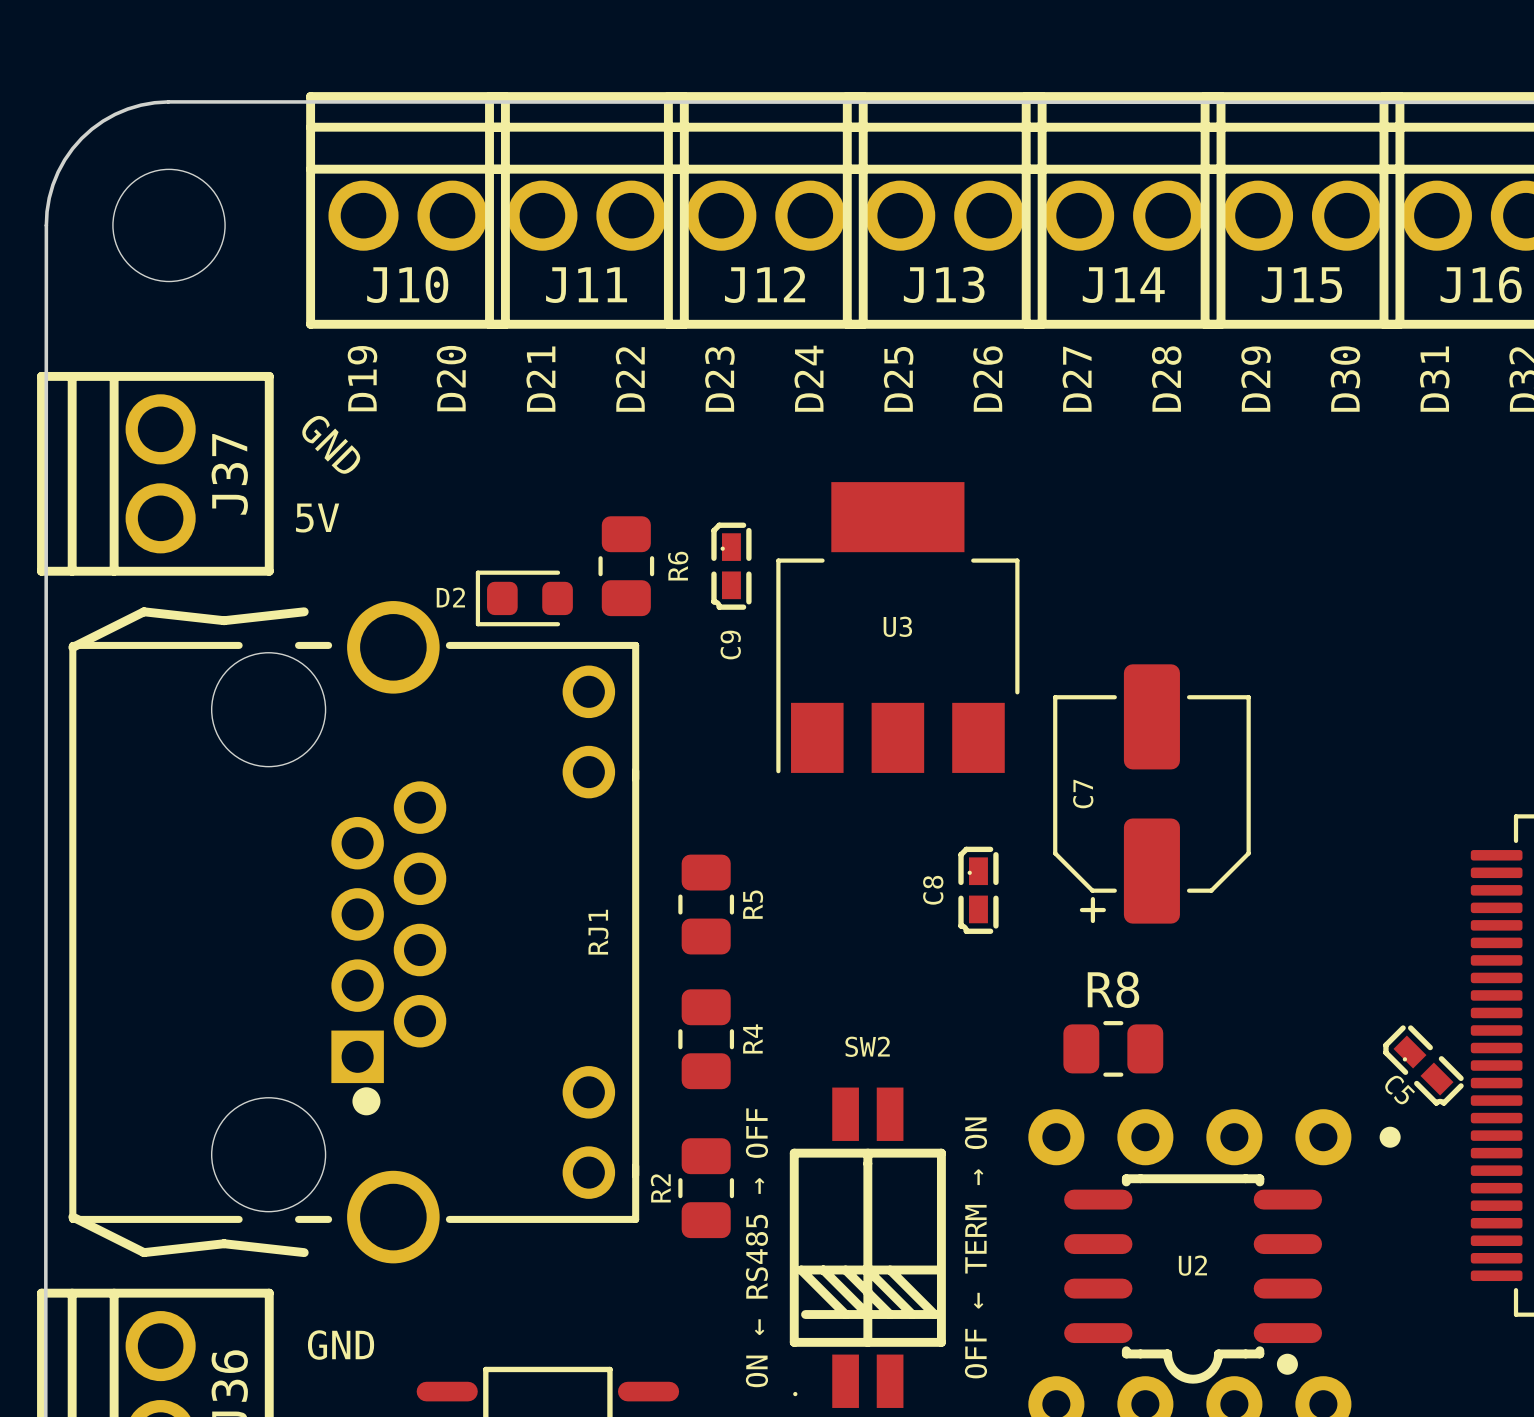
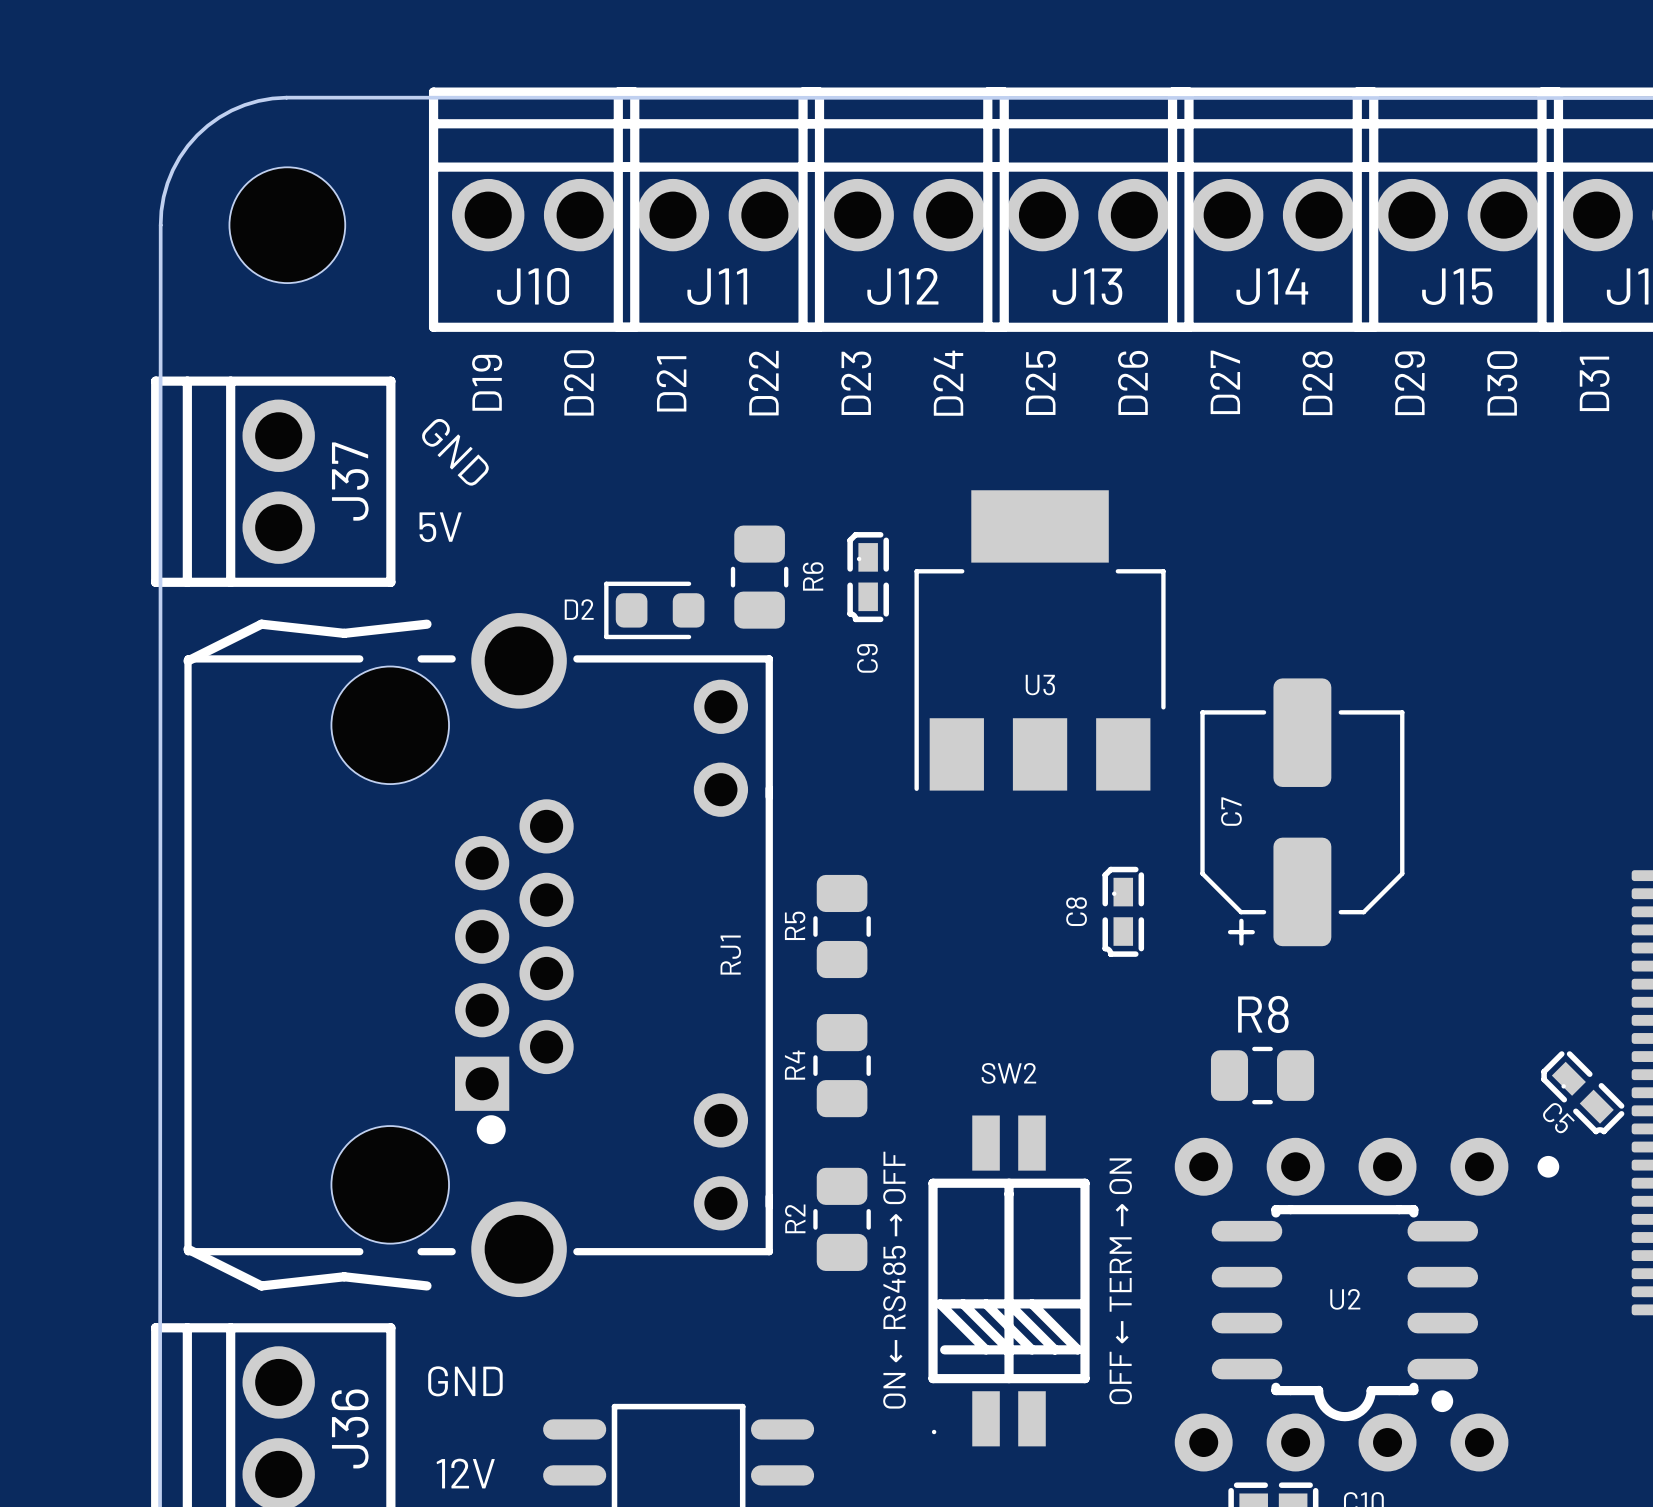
U3 name position: U3 (897, 626) -> U3 (1040, 685)
R5 name position: R5 (753, 904) -> R5 (795, 925)
R4 name position: R4 (752, 1038) -> R4 (795, 1065)

